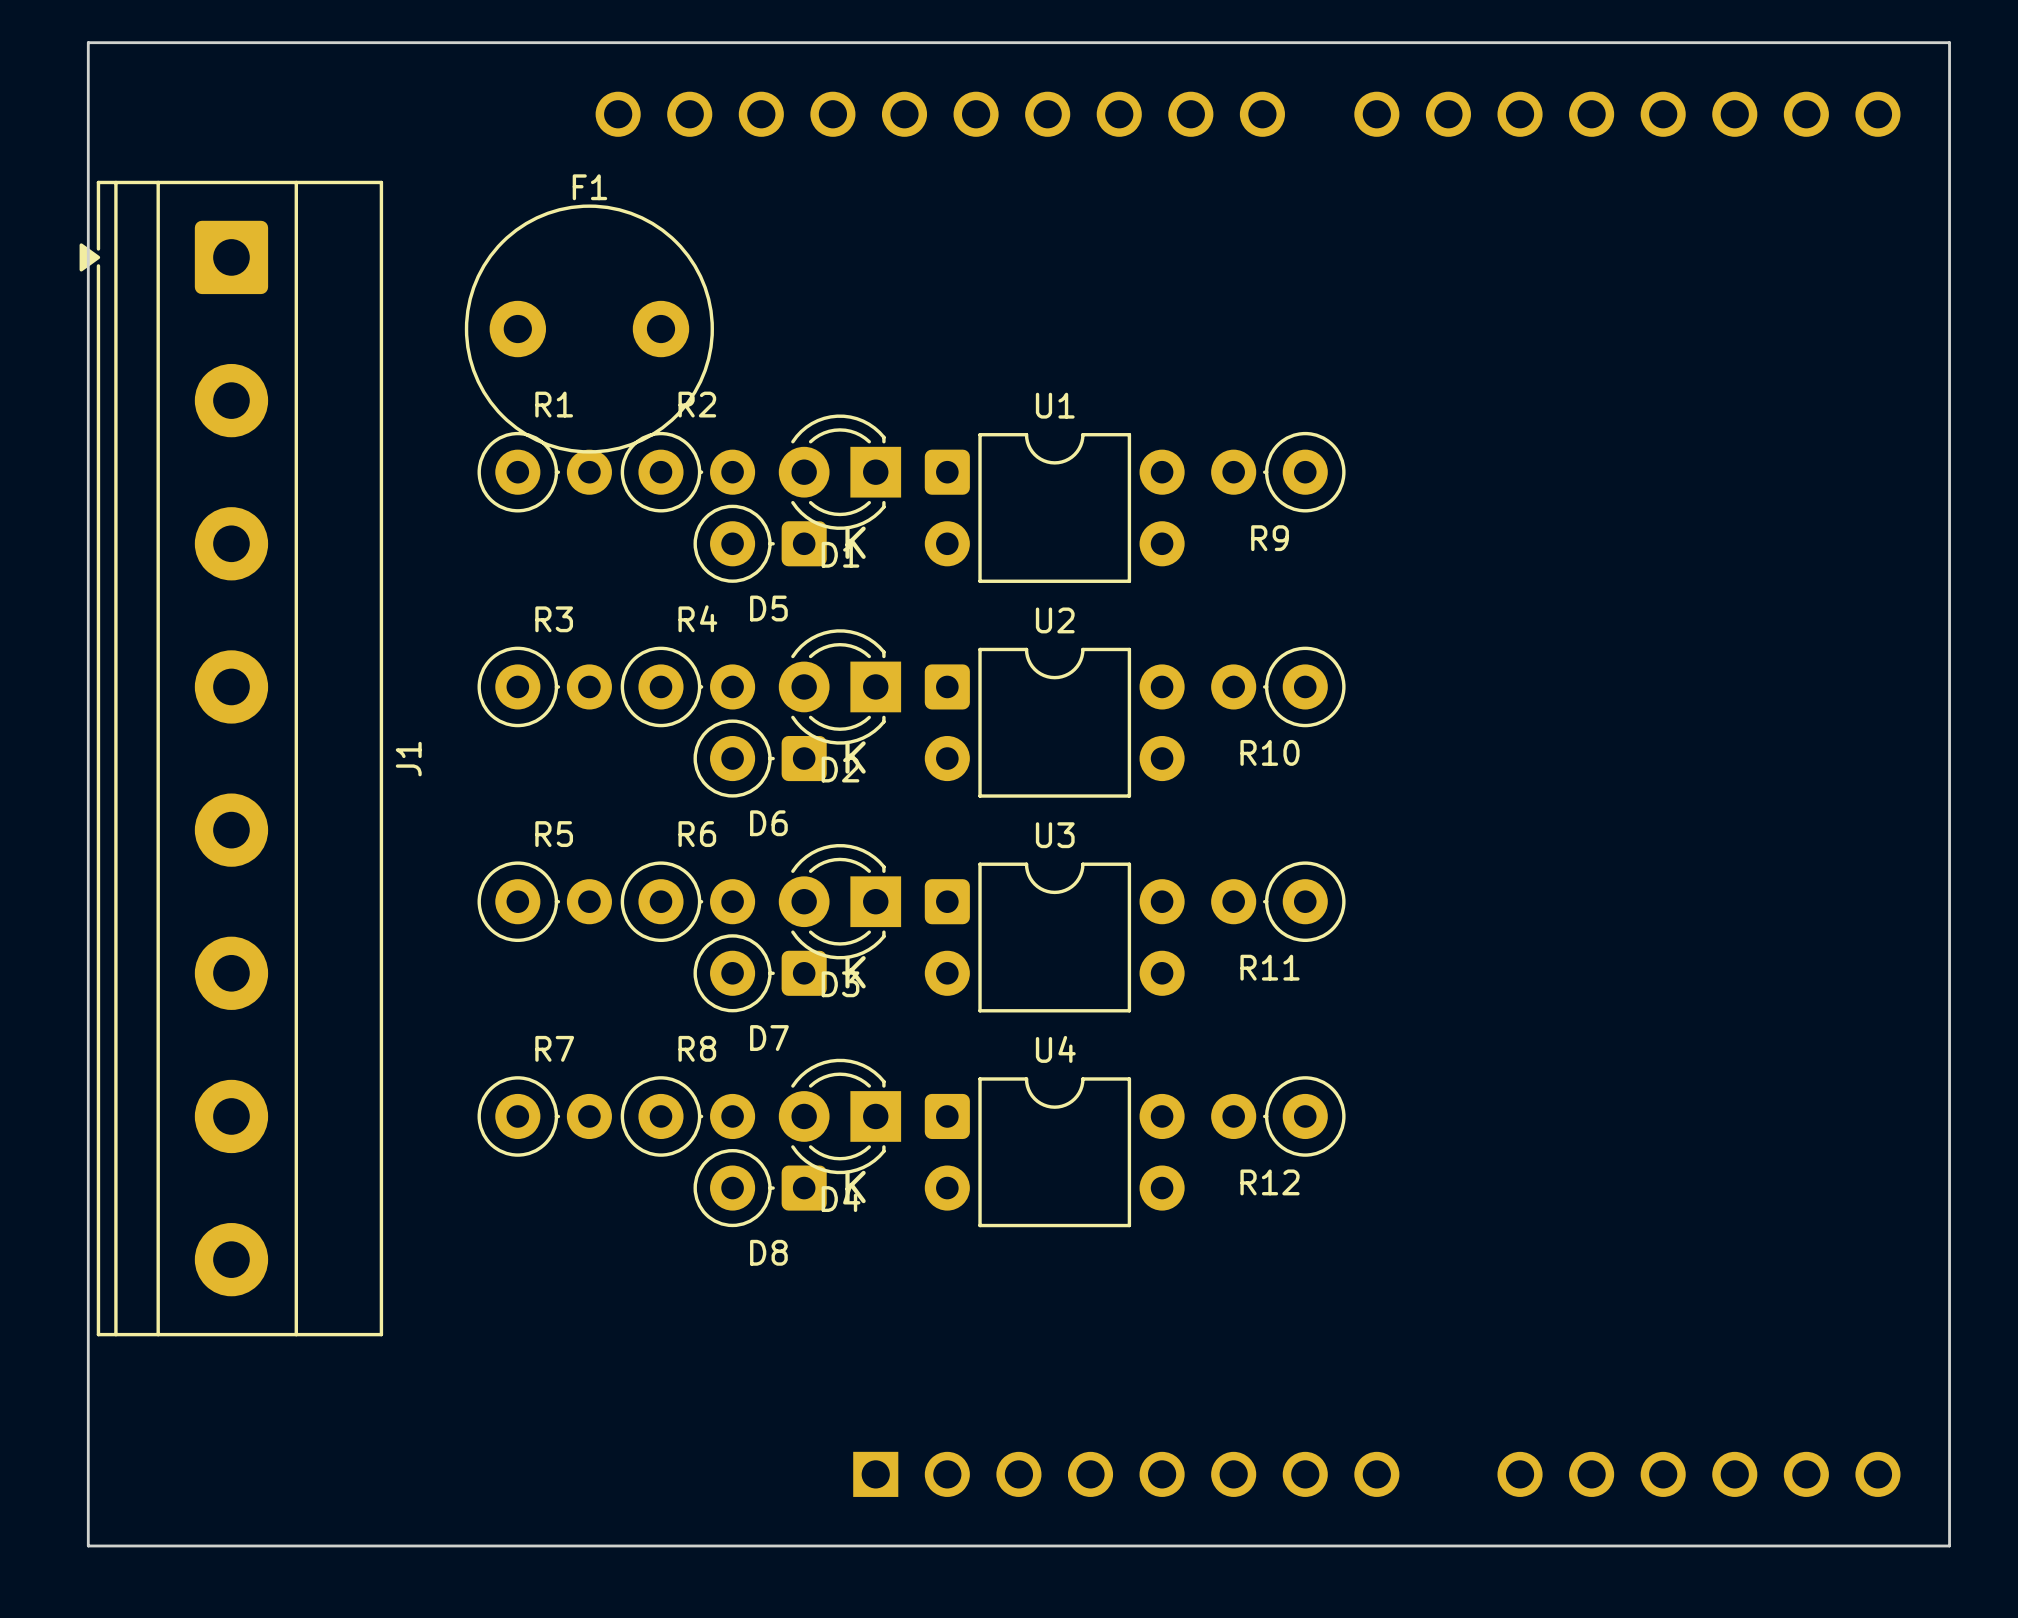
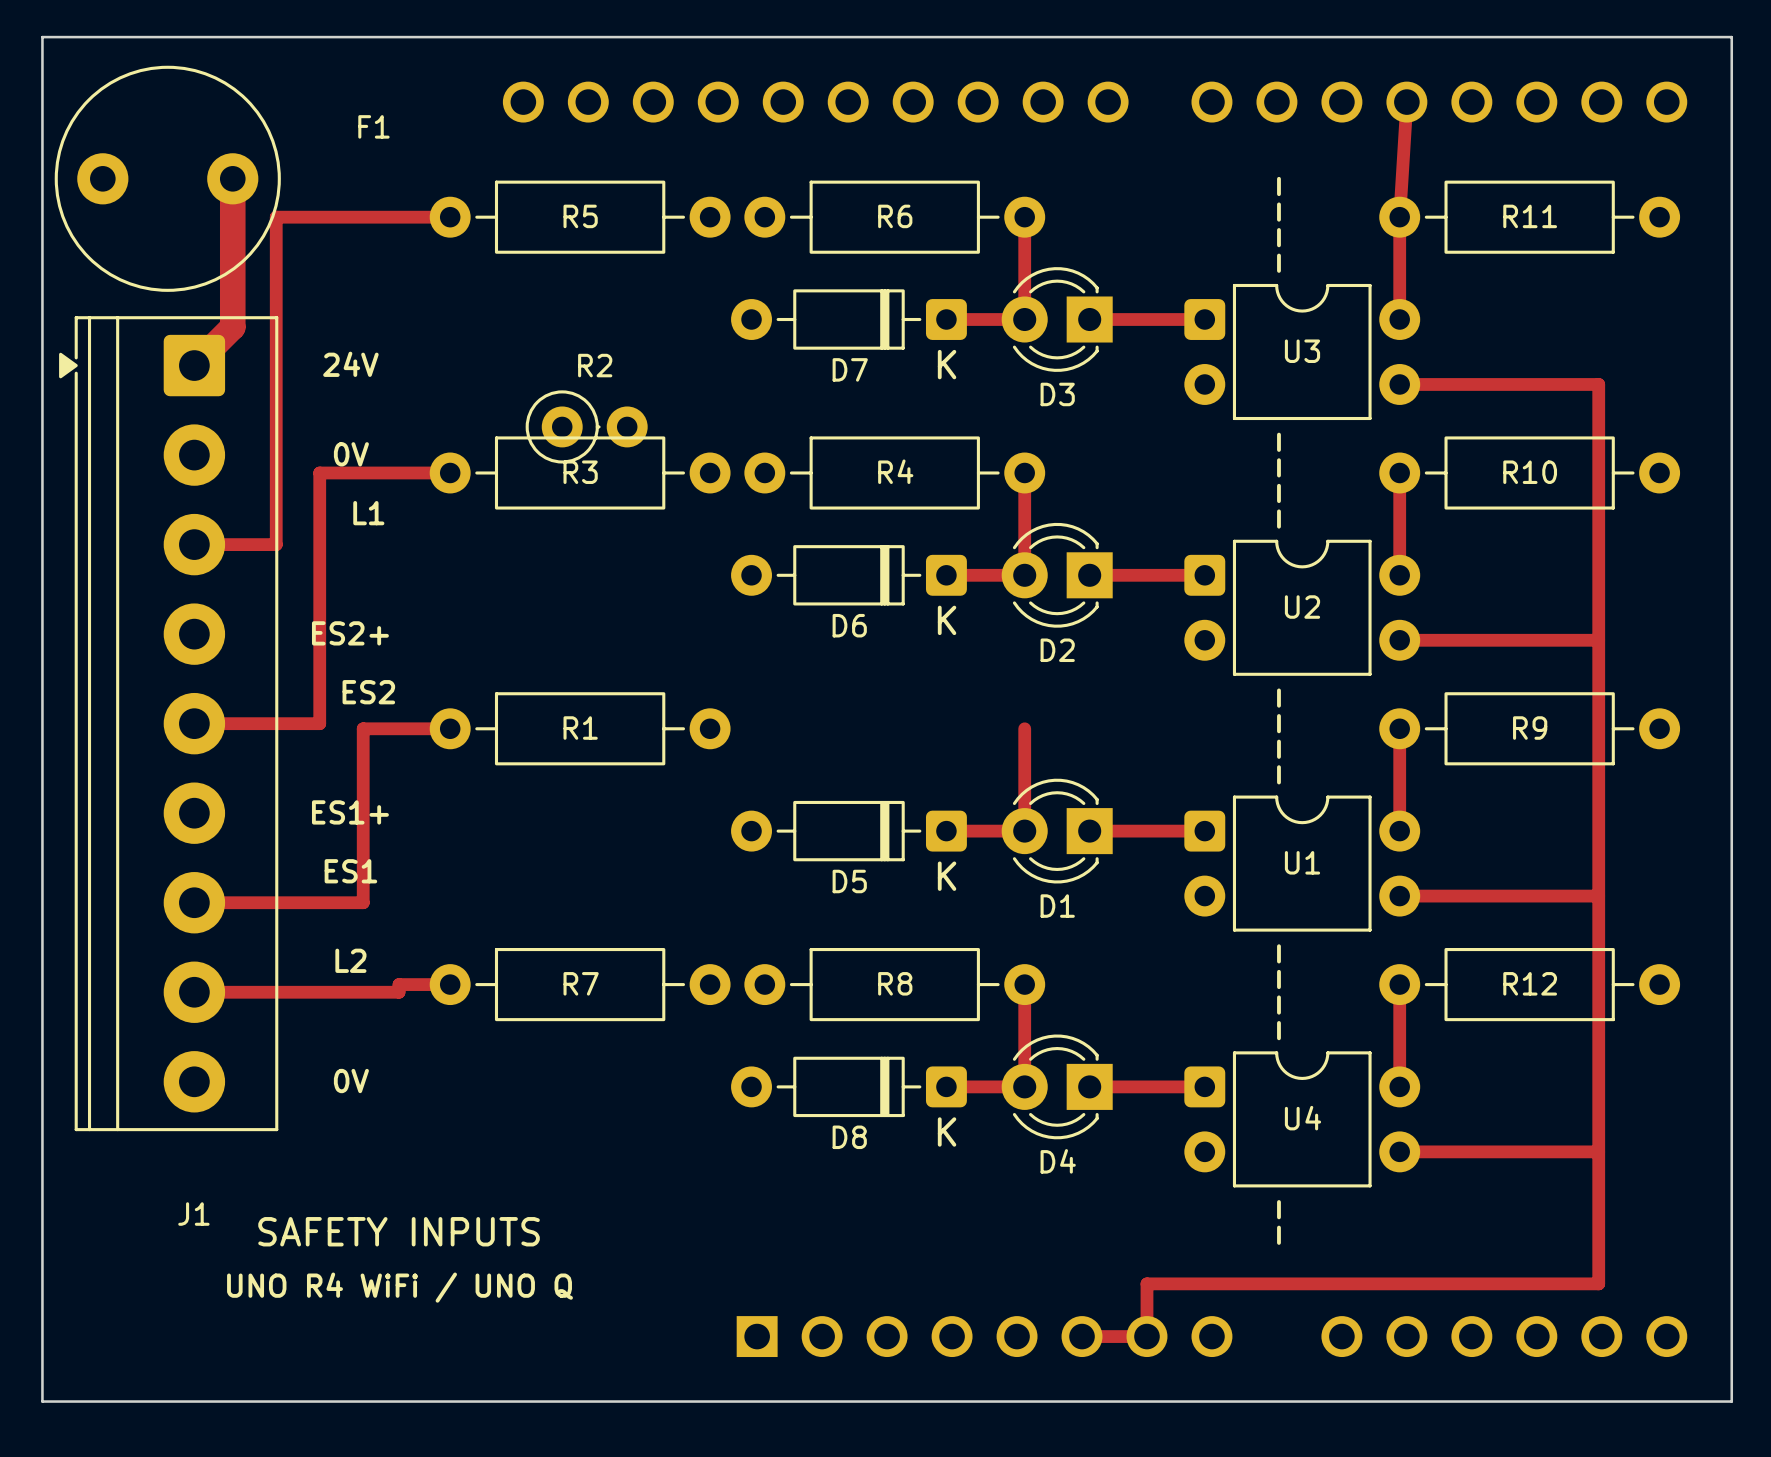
track: none -> (1406, 102) (1399, 217) (1399, 319)
J1 footprint: [79, 180, 384, 1337] -> [59, 316, 279, 1132]
F1 name position: F1 (589, 187) -> F1 (373, 126)
track: none -> (232, 178) (232, 327) (194, 365)
line: none -> (1278, 178) (1278, 194)
line: none -> (1278, 204) (1278, 219)
track: none -> (450, 217) (276, 217) (276, 544) (194, 544)
track: none -> (1024, 217) (1024, 319) (946, 319)
line: none -> (1278, 229) (1278, 245)
line: none -> (1278, 255) (1278, 270)
F1 position: (589, 329) -> (167, 178)
track: none -> (1089, 319) (1204, 319)
text: none -> 24V (350, 364)
R1 name position: R1 (554, 404) -> R1 (580, 728)
U1 name position: U1 (1055, 405) -> U1 (1302, 862)
track: none -> (1399, 384) (1598, 384) (1598, 1283) (1146, 1283) (1146, 1336) (1082, 1336)
R1 footprint: [477, 431, 612, 513] -> [429, 692, 731, 766]
R9 footprint: [1211, 431, 1346, 513] -> [1379, 692, 1681, 766]
D1 position: (839, 472) -> (1057, 831)
line: none -> (1278, 434) (1278, 449)
text: none -> 0V (351, 454)
D5 footprint: [693, 504, 827, 583] -> [731, 800, 967, 862]
U1 position: (1054, 507) -> (1302, 863)
line: none -> (1278, 460) (1278, 475)
track: none -> (450, 472) (319, 472) (319, 723) (194, 723)
track: none -> (1024, 472) (1024, 575) (946, 575)
track: none -> (1399, 472) (1399, 575)
line: none -> (1278, 485) (1278, 501)
R9 name position: R9 (1270, 538) -> R9 (1530, 728)
line: none -> (1278, 511) (1278, 526)
text: none -> L1 (368, 513)
R4 name position: R4 (697, 618) -> R4 (895, 471)
R3 name position: R3 (554, 619) -> R3 (580, 472)
U2 name position: U2 (1055, 620) -> U2 (1302, 607)
track: none -> (1089, 575) (1204, 575)
R3 footprint: [477, 646, 612, 728] -> [429, 436, 731, 510]
R4 footprint: [620, 646, 756, 728] -> [744, 436, 1046, 510]
R10 footprint: [1211, 646, 1346, 728] -> [1379, 436, 1681, 510]
D2 position: (839, 686) -> (1057, 575)
text: none -> ES2+ (350, 633)
track: none -> (1399, 640) (1598, 640)
D6 footprint: [693, 719, 827, 798] -> [731, 545, 967, 606]
U2 position: (1054, 722) -> (1302, 607)
R10 name position: R10 (1270, 752) -> R10 (1530, 472)
J1 name position: J1 (408, 759) -> J1 (193, 1214)
line: none -> (1278, 690) (1278, 705)
text: none -> ES2 (368, 692)
line: none -> (1278, 715) (1278, 731)
track: none -> (450, 728) (363, 728) (363, 902) (194, 902)
track: none -> (1024, 728) (1024, 831) (946, 831)
track: none -> (1399, 728) (1399, 831)
line: none -> (1278, 741) (1278, 756)
R5 name position: R5 (554, 834) -> R5 (580, 216)
R6 name position: R6 (697, 834) -> R6 (895, 216)
U3 name position: U3 (1055, 835) -> U3 (1302, 351)
line: none -> (1278, 767) (1278, 782)
R5 footprint: [477, 861, 612, 943] -> [429, 180, 731, 254]
R6 footprint: [620, 861, 756, 943] -> [744, 180, 1046, 254]
R11 footprint: [1211, 861, 1346, 943] -> [1379, 180, 1681, 254]
text: none -> ES1+ (350, 812)
D3 position: (839, 901) -> (1057, 319)
track: none -> (1089, 831) (1204, 831)
D7 footprint: [693, 934, 827, 1013] -> [731, 289, 967, 350]
U3 position: (1054, 937) -> (1302, 351)
text: none -> ES1 (350, 871)
R11 name position: R11 (1270, 967) -> R11 (1530, 216)
track: none -> (1399, 896) (1598, 896)
line: none -> (1278, 946) (1278, 961)
R7 name position: R7 (554, 1048) -> R7 (581, 983)
R8 name position: R8 (697, 1048) -> R8 (895, 983)
U4 name position: U4 (1055, 1049) -> U4 (1302, 1118)
text: none -> L2 (350, 960)
line: none -> (1278, 971) (1278, 987)
R7 footprint: [477, 1076, 612, 1157] -> [429, 948, 731, 1022]
R8 footprint: [620, 1076, 756, 1157] -> [744, 948, 1046, 1022]
R12 footprint: [1211, 1076, 1346, 1157] -> [1379, 948, 1681, 1022]
track: none -> (450, 984) (399, 984) (399, 992) (194, 992)
track: none -> (1024, 984) (1024, 1086) (946, 1086)
track: none -> (1399, 984) (1399, 1086)
line: none -> (1278, 997) (1278, 1012)
D4 position: (839, 1116) -> (1057, 1086)
line: none -> (1278, 1022) (1278, 1038)
D8 footprint: [693, 1148, 827, 1228] -> [731, 1056, 967, 1118]
U4 position: (1054, 1152) -> (1302, 1119)
R12 name position: R12 (1270, 1182) -> R12 (1530, 983)
text: none -> 0V (351, 1081)
track: none -> (1089, 1086) (1204, 1086)
track: none -> (1399, 1151) (1598, 1151)
line: none -> (1278, 1202) (1278, 1217)
line: none -> (1278, 1227) (1278, 1242)
text: none -> SAFETY INPUTS (399, 1231)
text: none -> UNO R4 WiFi / UNO Q (400, 1287)

